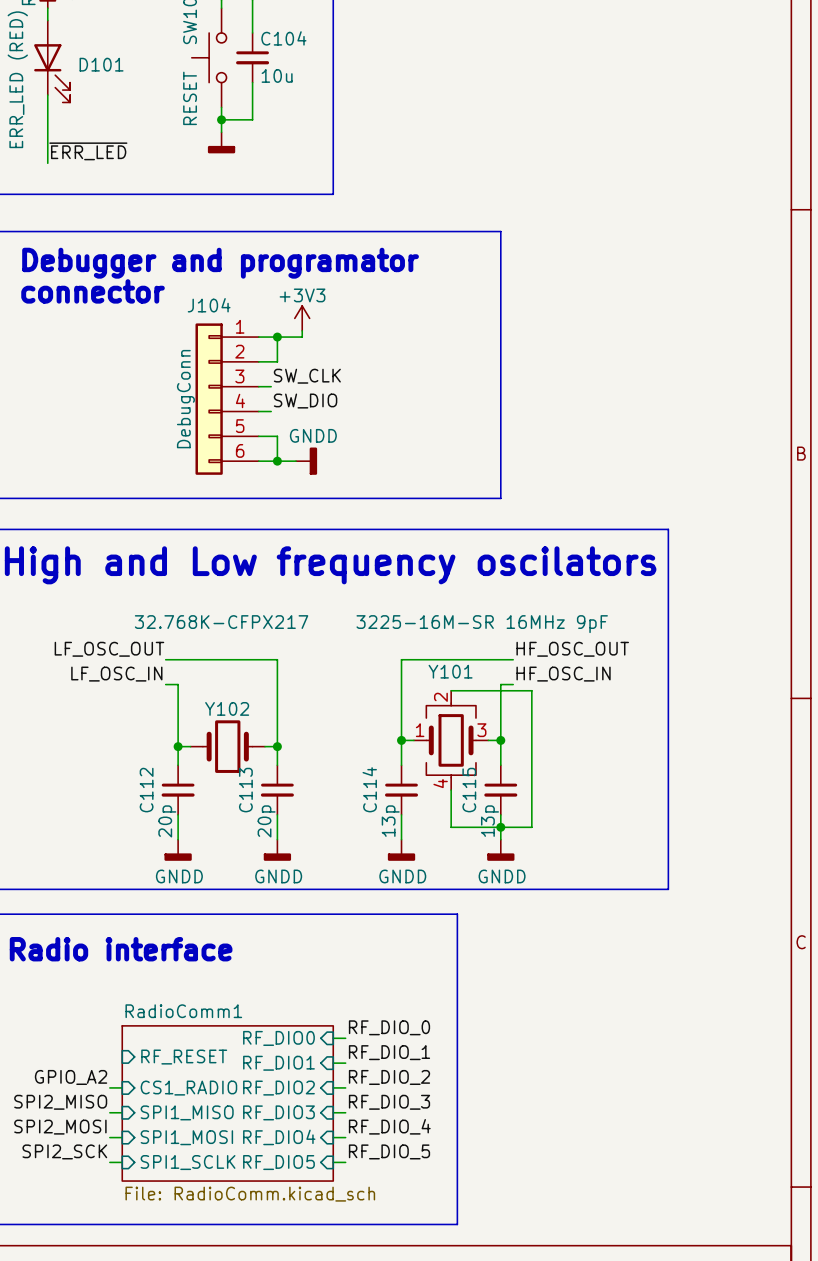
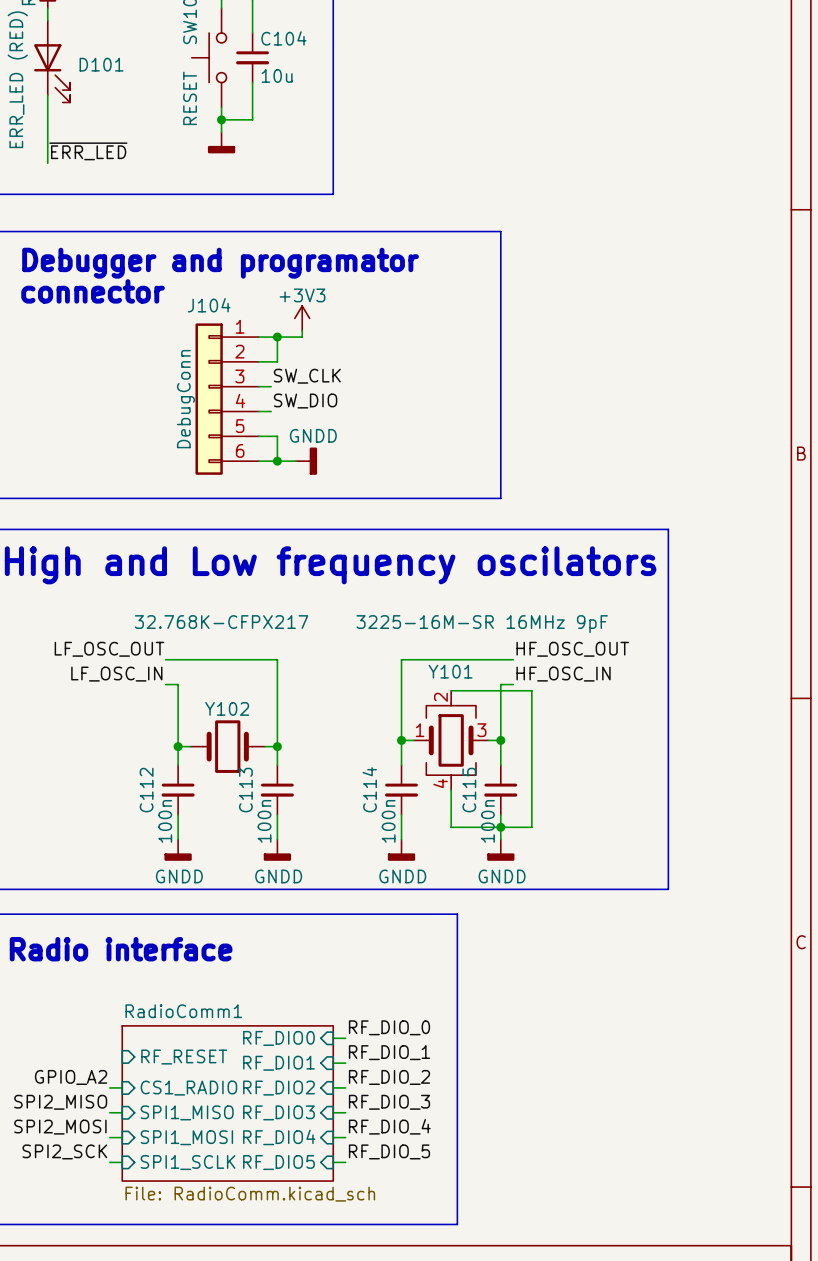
C112 value: 20p (167, 821) -> 100n (165, 821)
C113 value: 20p (266, 821) -> 100n (264, 821)
C114 value: 13p (390, 821) -> 100n (388, 821)
C115 value: 13p (490, 821) -> 100n (487, 821)

